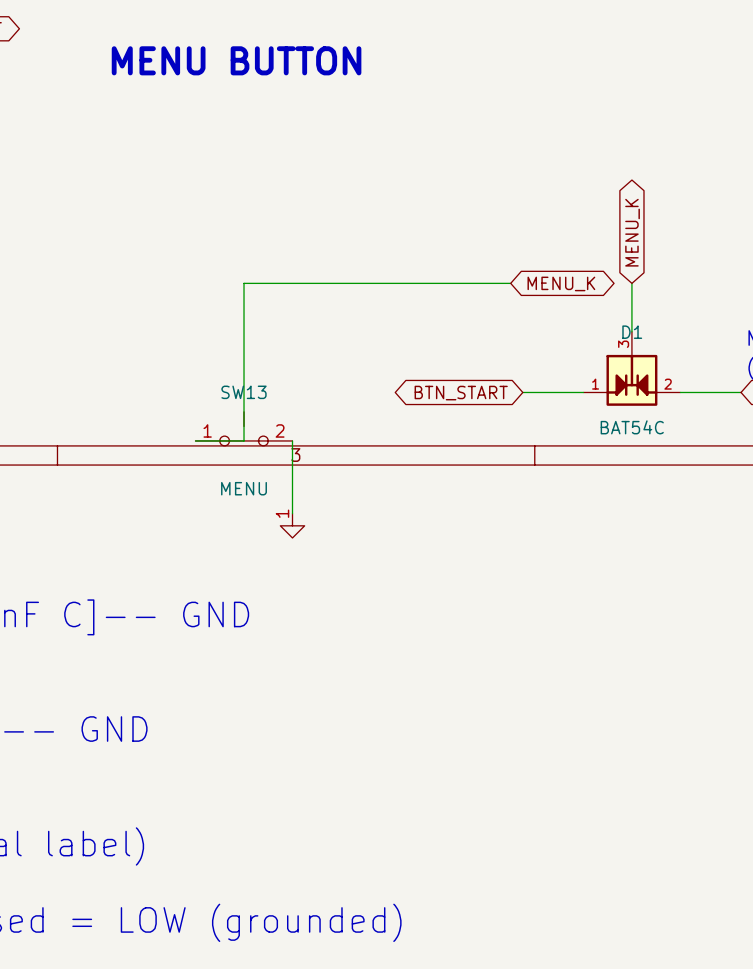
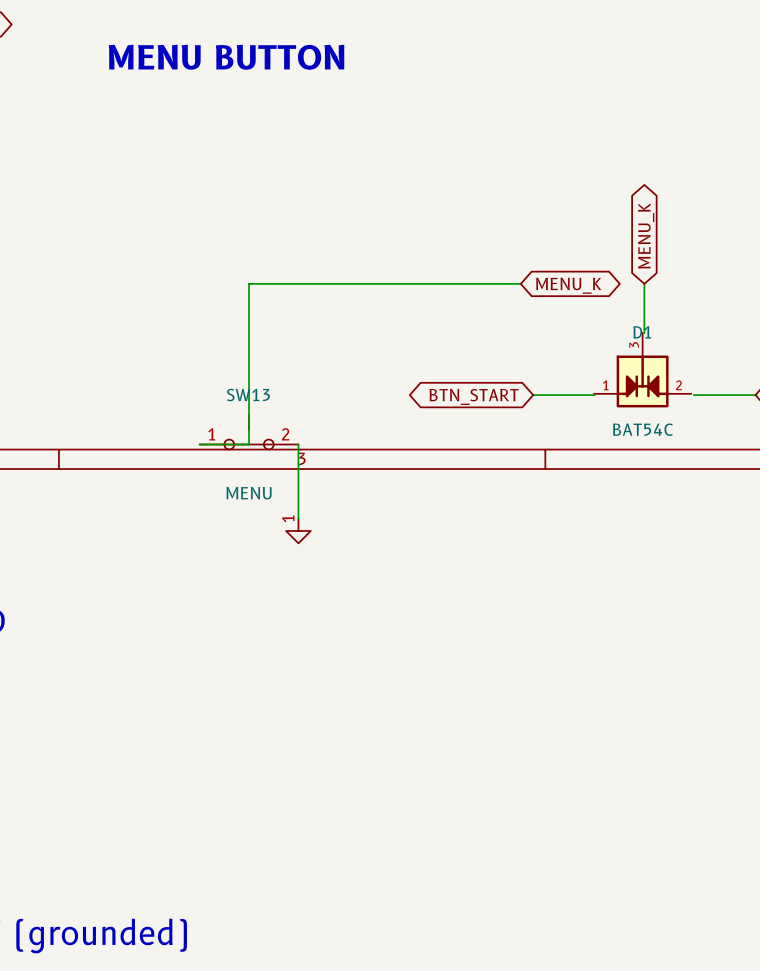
D1 symbol: [583, 331, 681, 406] -> [593, 332, 692, 408]

